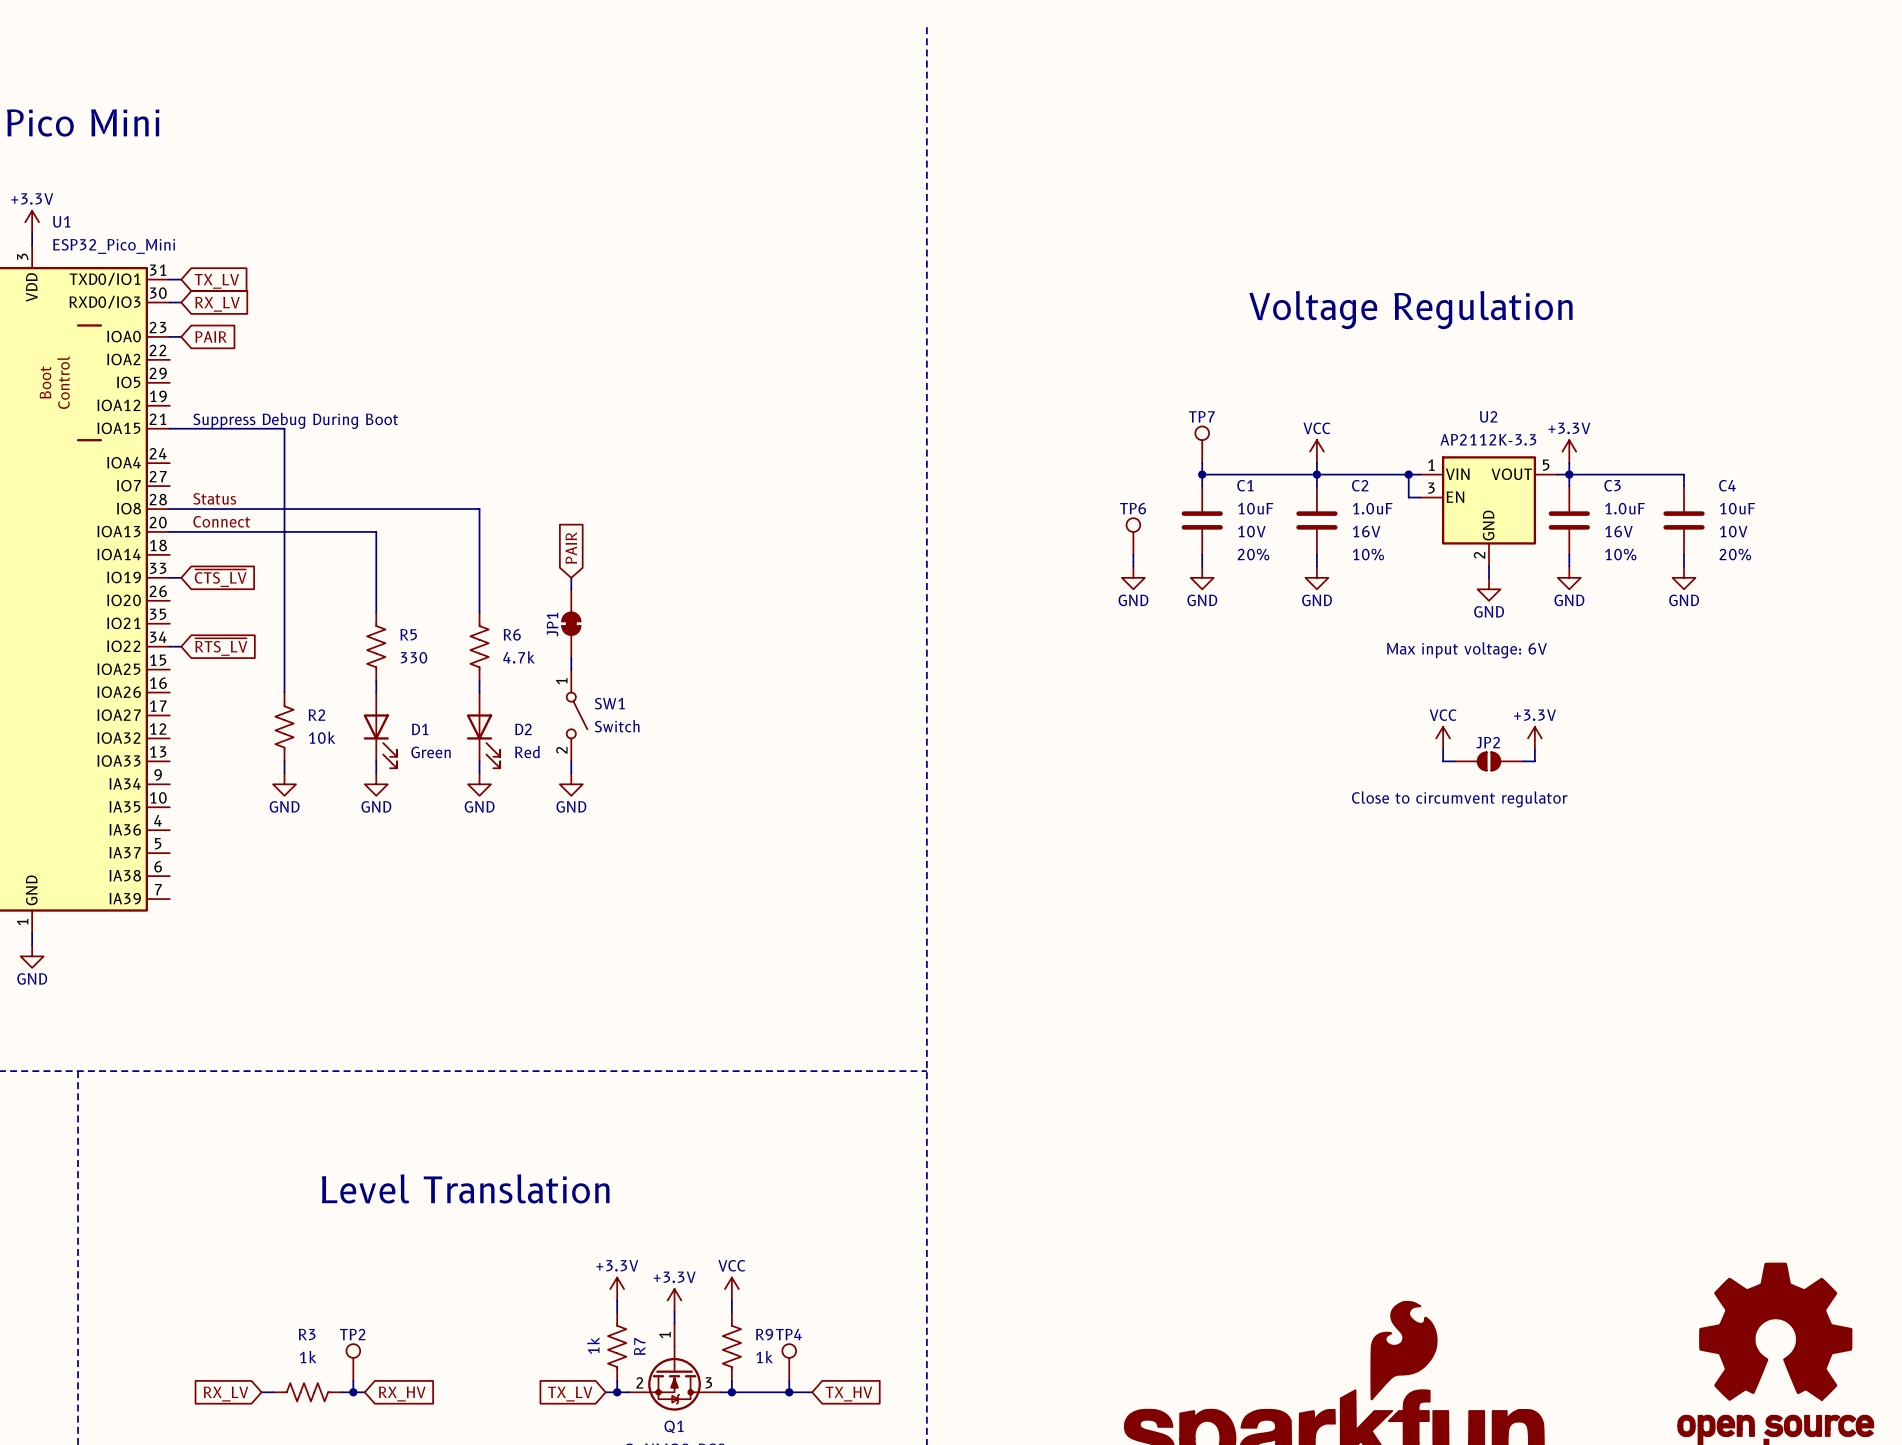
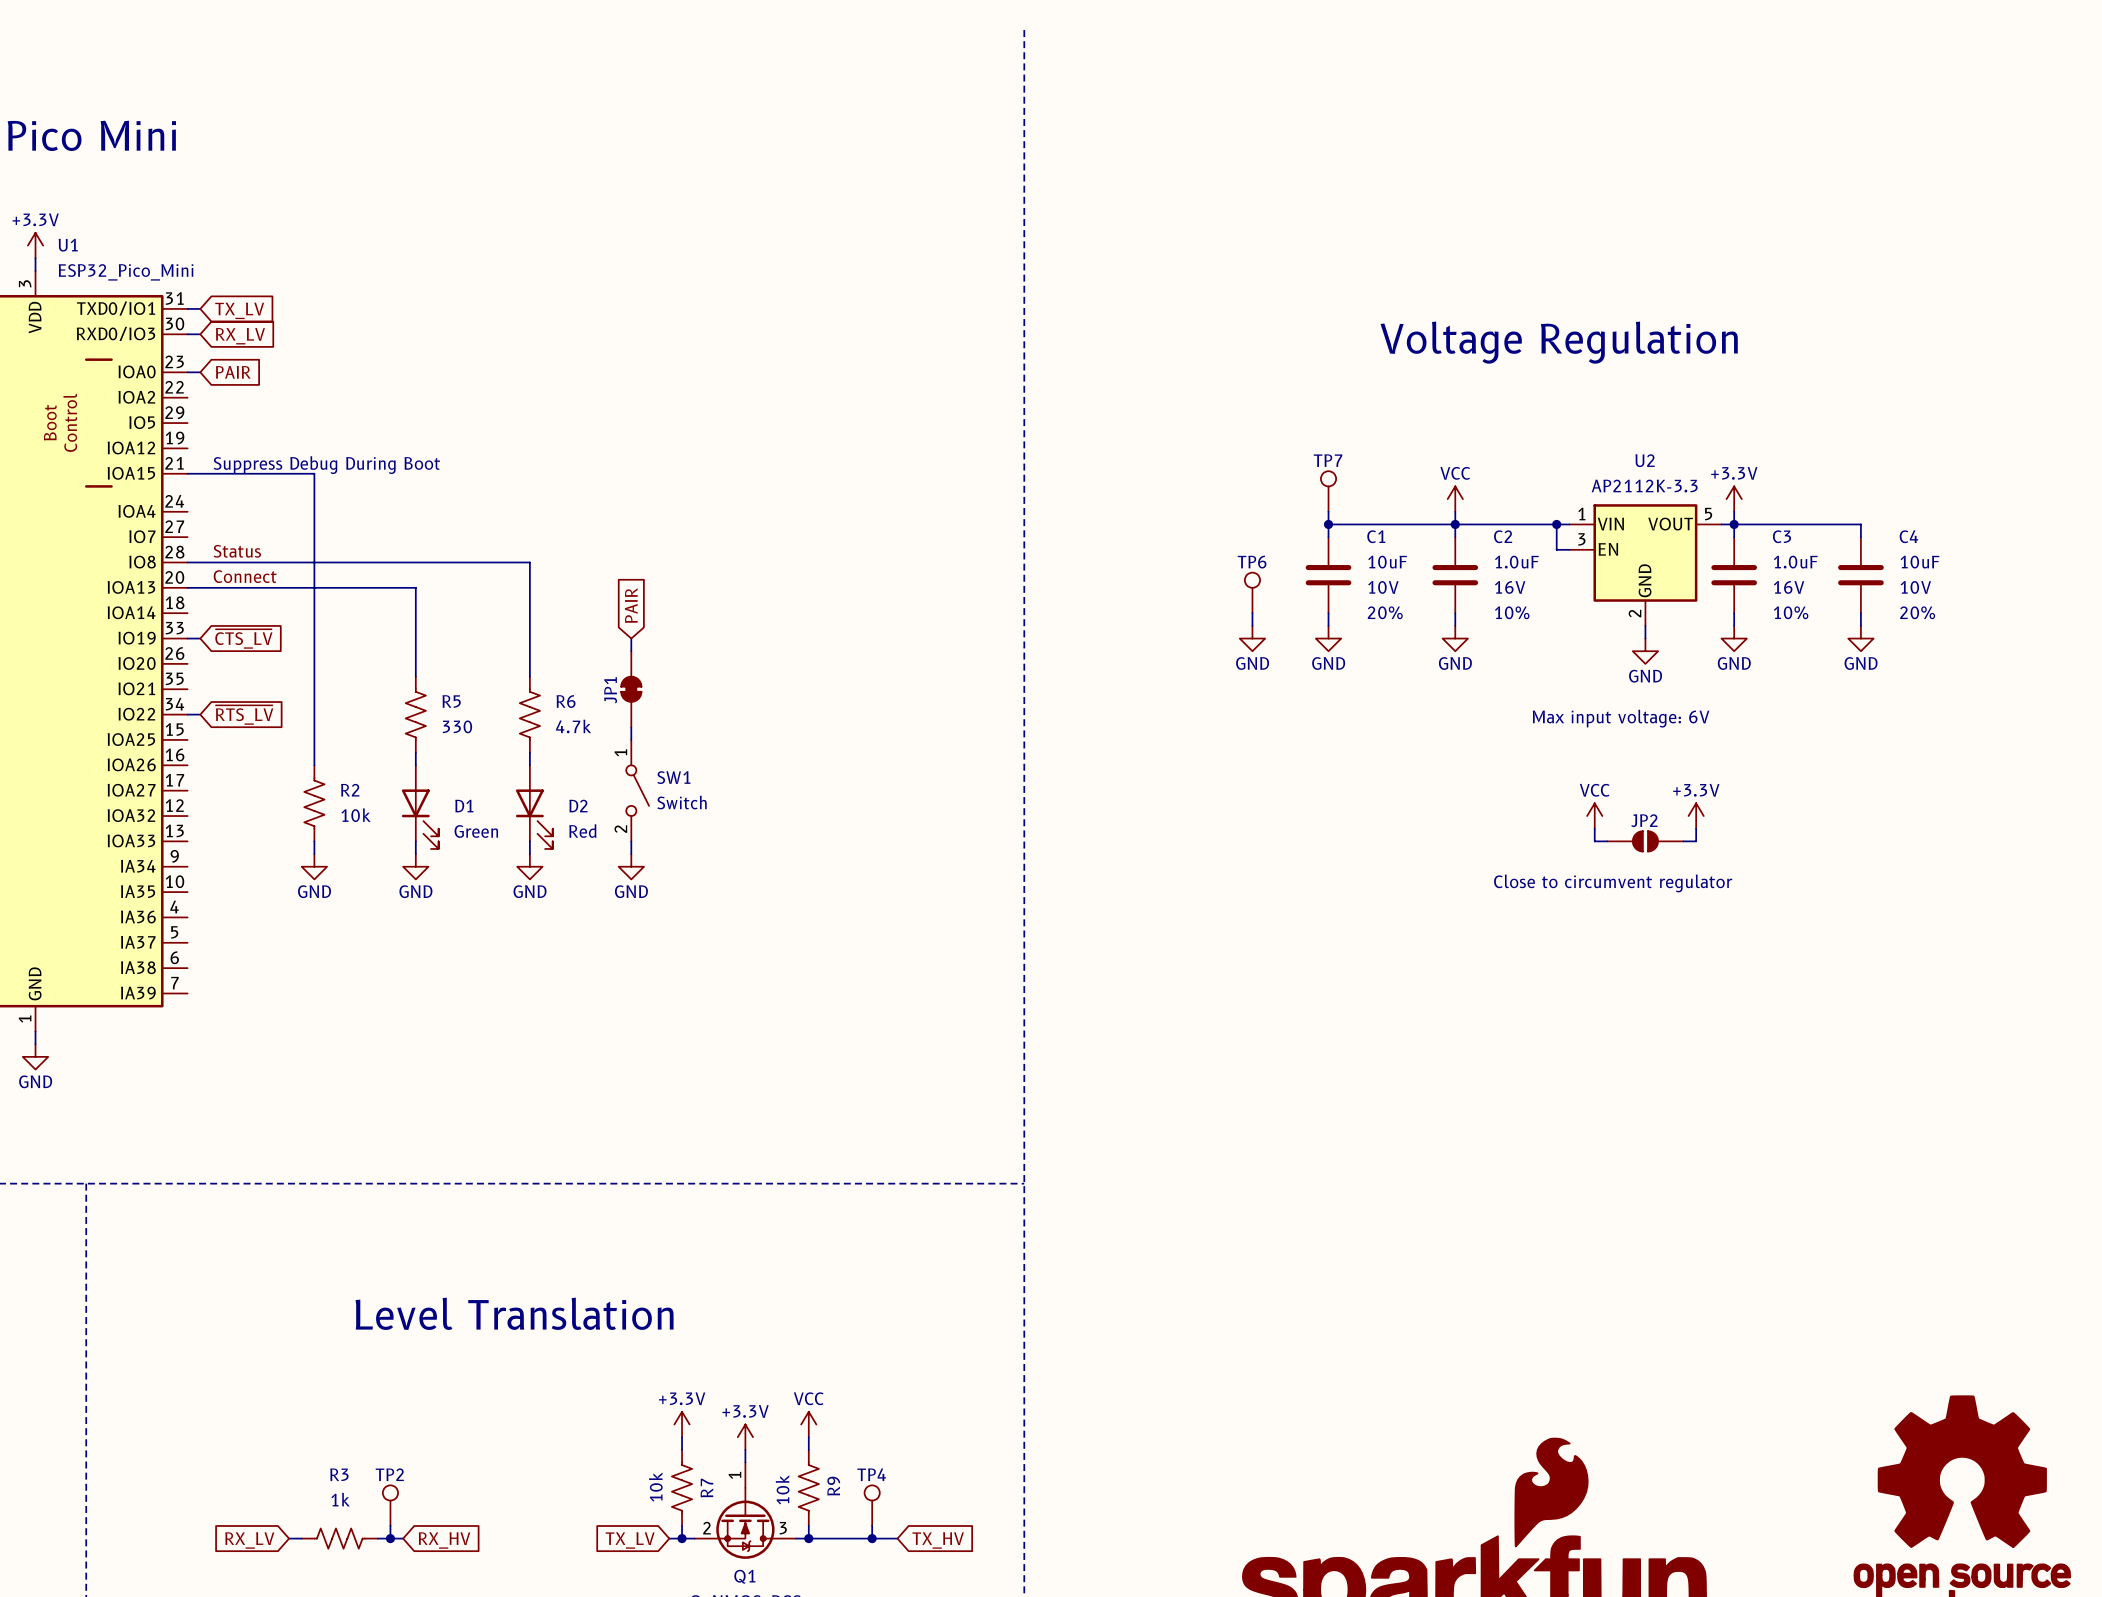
R9 name rotation: 0° (764, 1334) -> 90° counterclockwise (833, 1486)
R7 value: 1k (593, 1345) -> 10k (655, 1487)
R9 value: 1k (764, 1357) -> 10k (782, 1489)

